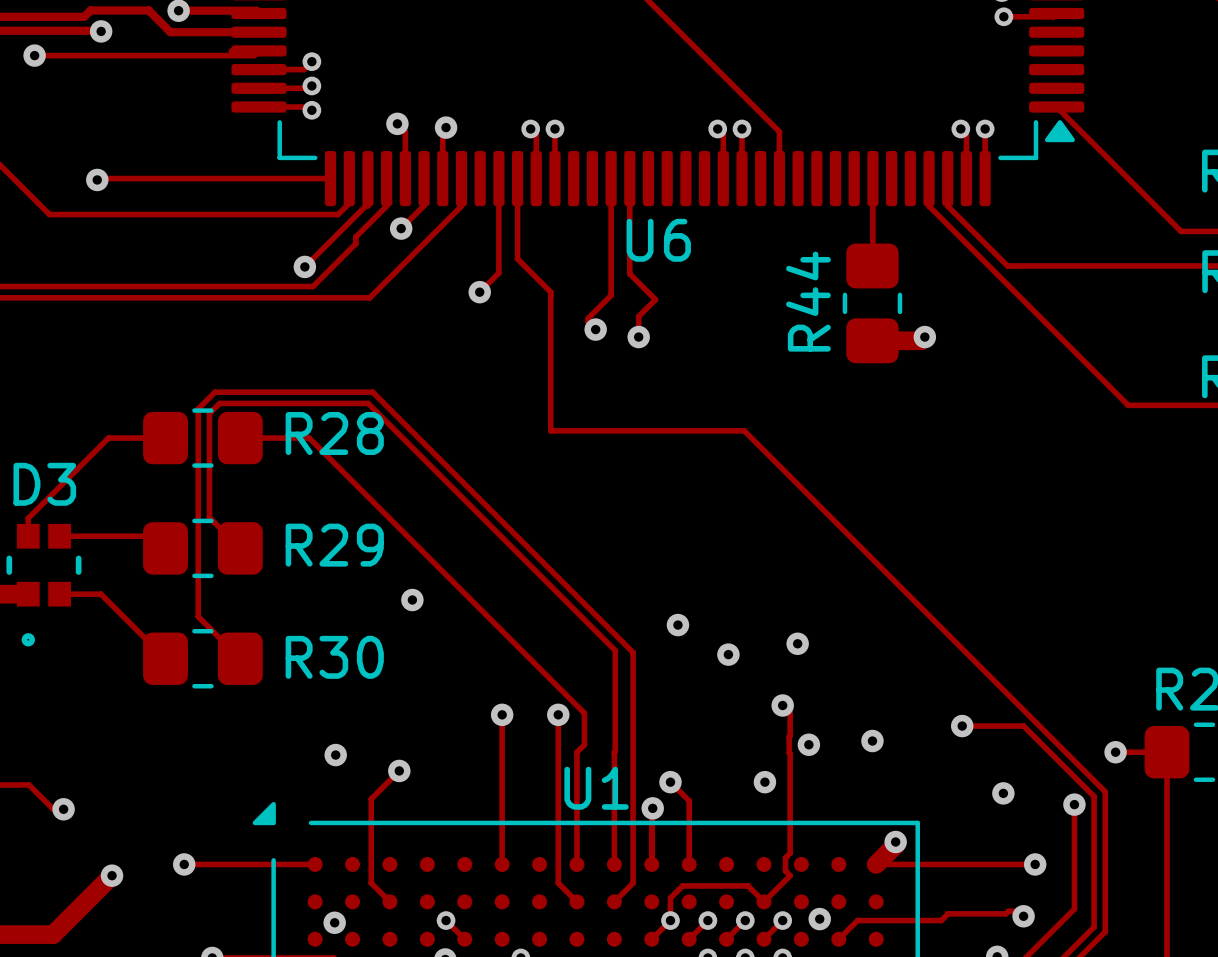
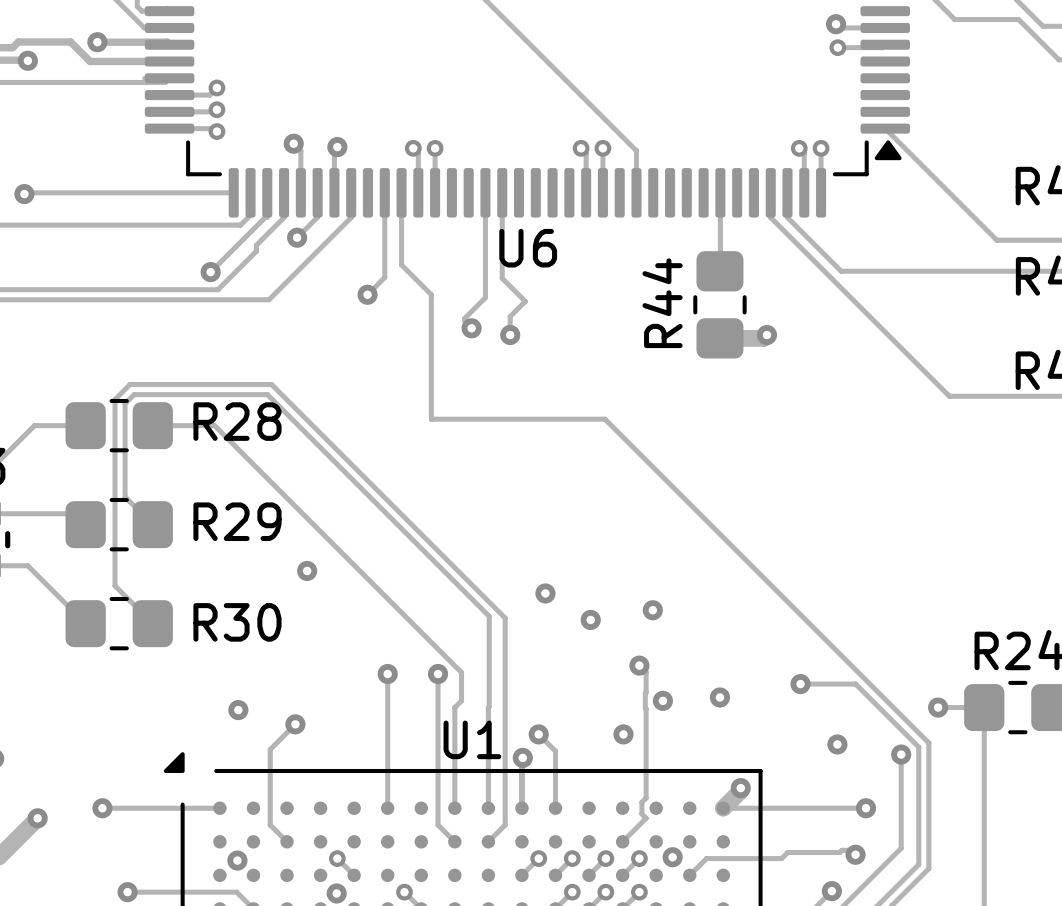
track: (763, 901) (748, 885) (682, 885) (670, 898) (670, 920) -> none

